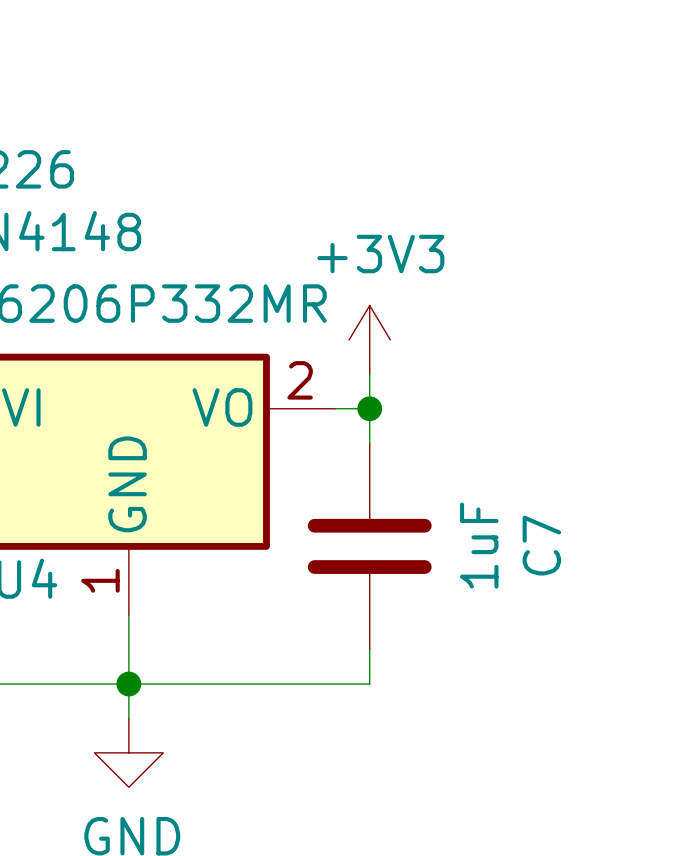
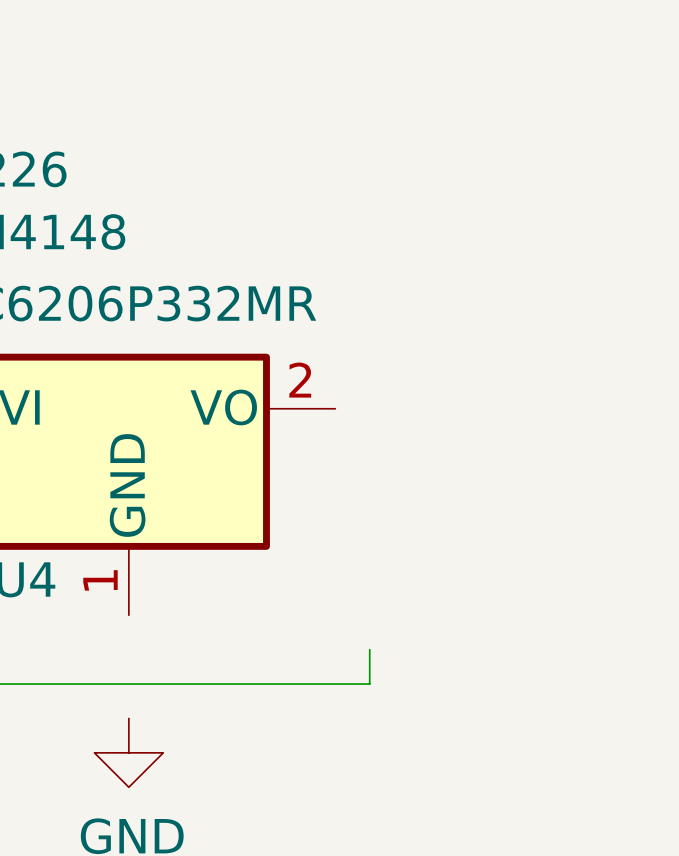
power symbol: +3V3 (369, 339) -> none
wire: (369, 374) (369, 443) -> none
wire: (335, 408) (369, 408) -> none
junction: (369, 408) -> none
C7: 1uF (369, 546) -> none
wire: (128, 615) (128, 718) -> none
junction: (128, 684) -> none

